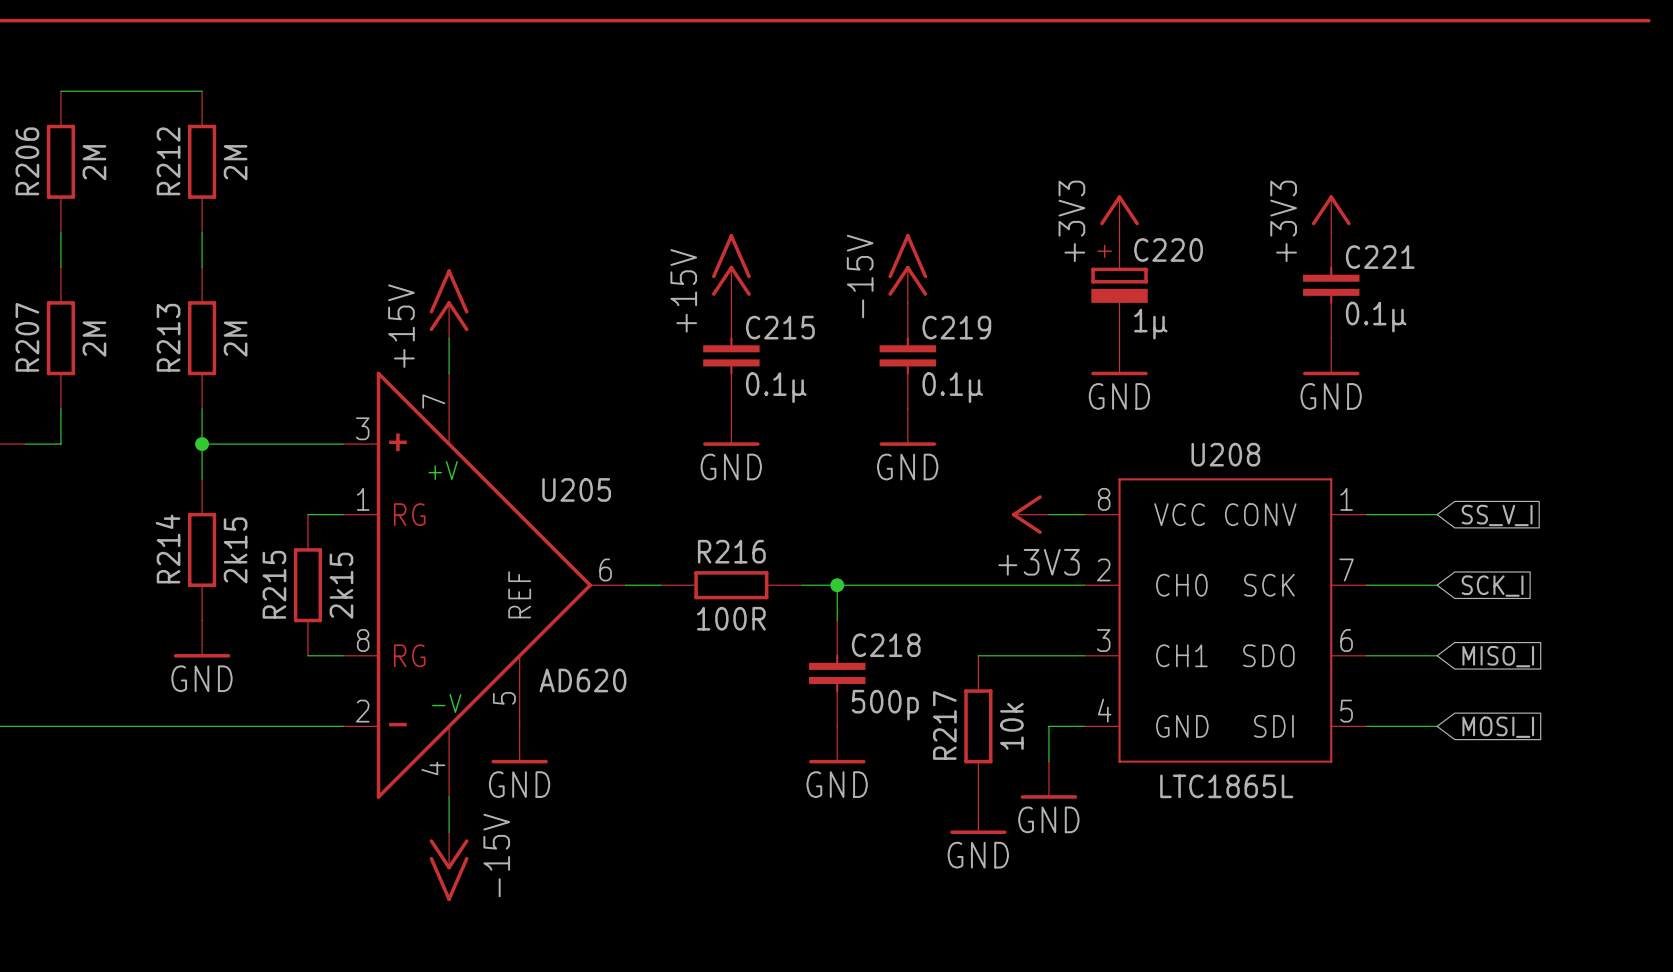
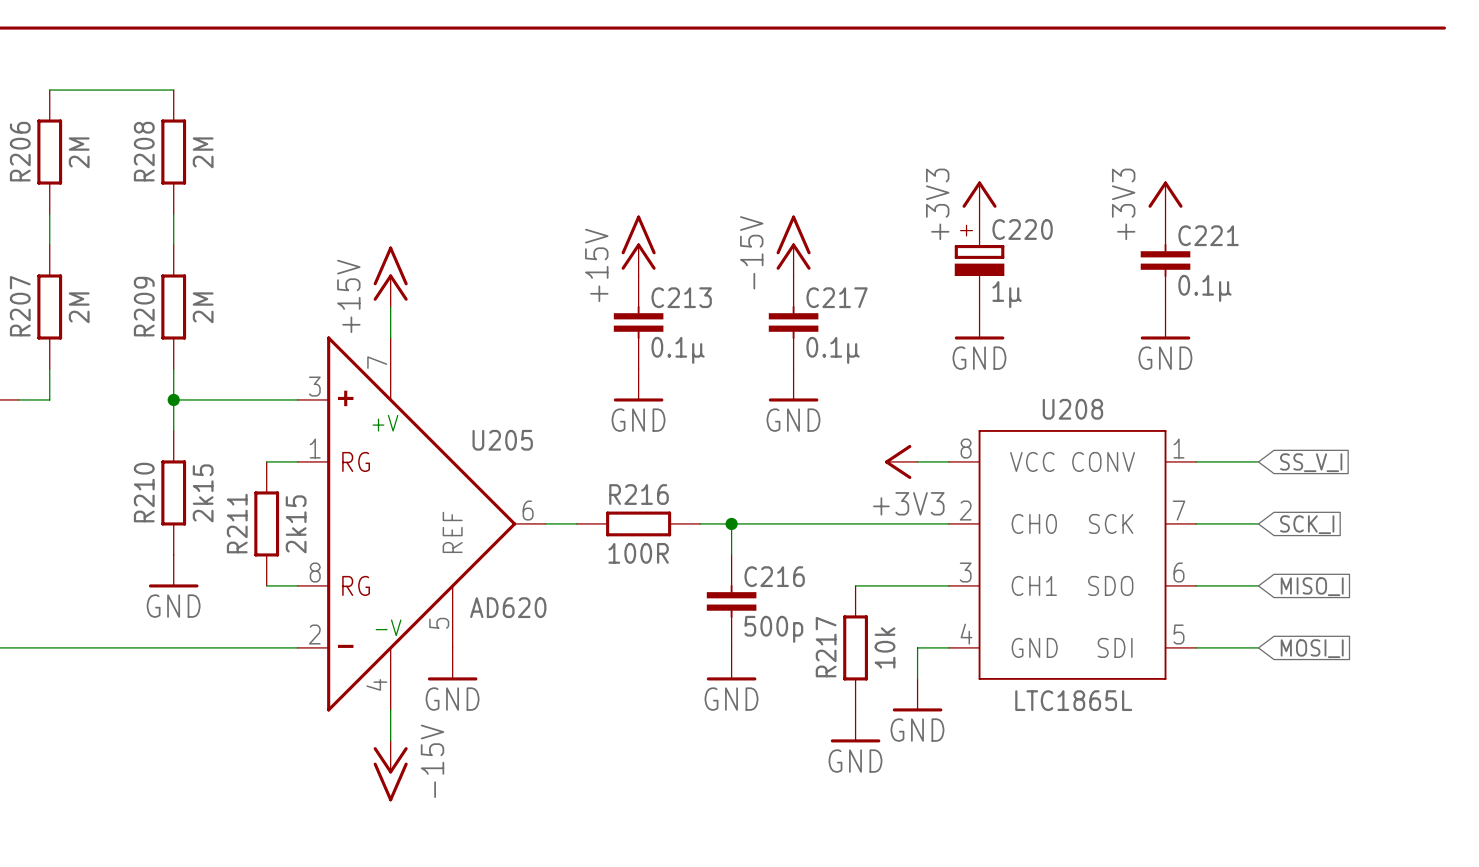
R212 name: R212 (168, 161) -> R208 (144, 151)
C215 name: C215 (780, 327) -> C213 (681, 297)
C219 name: C219 (956, 327) -> C217 (837, 297)
R213 name: R213 (168, 337) -> R209 (144, 306)
R214 name: R214 (168, 549) -> R210 (144, 492)
R215 name: R215 (274, 584) -> R211 (237, 523)
C218 name: C218 (886, 645) -> C216 (774, 576)

